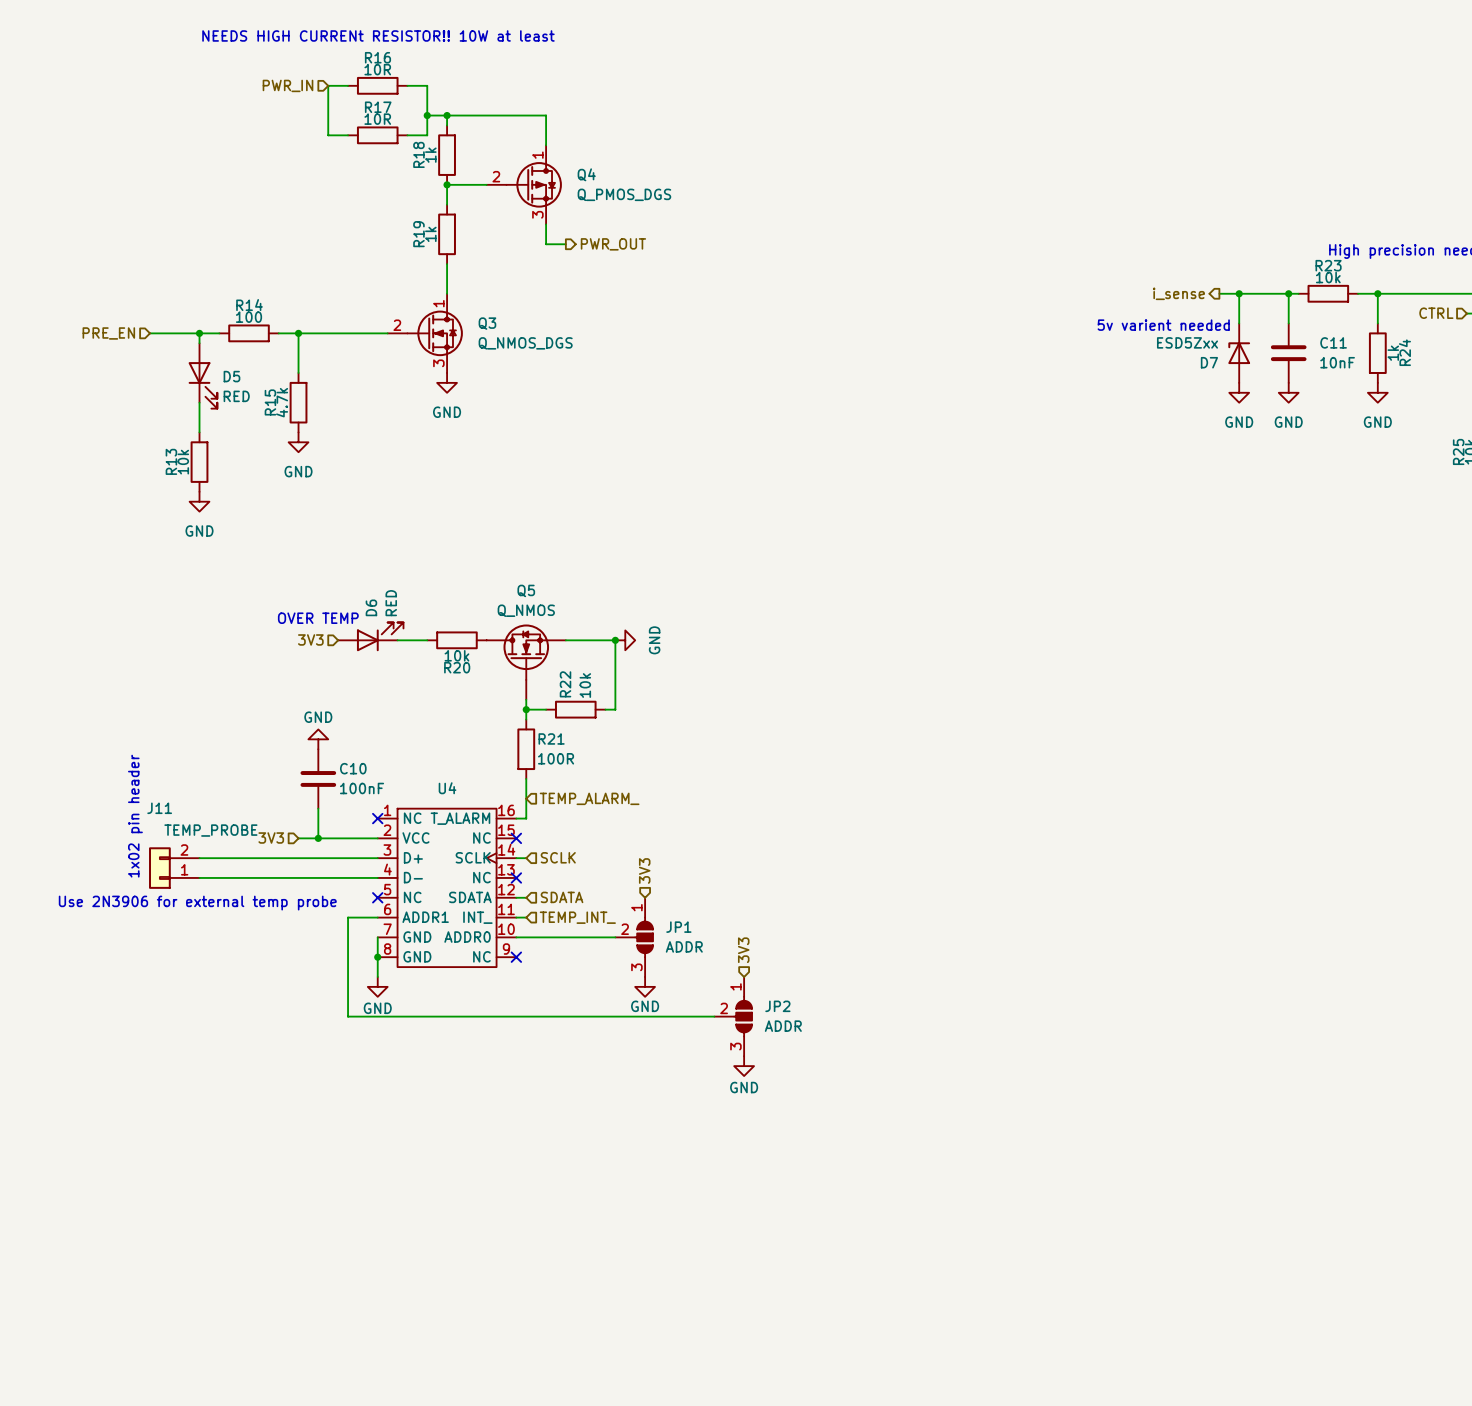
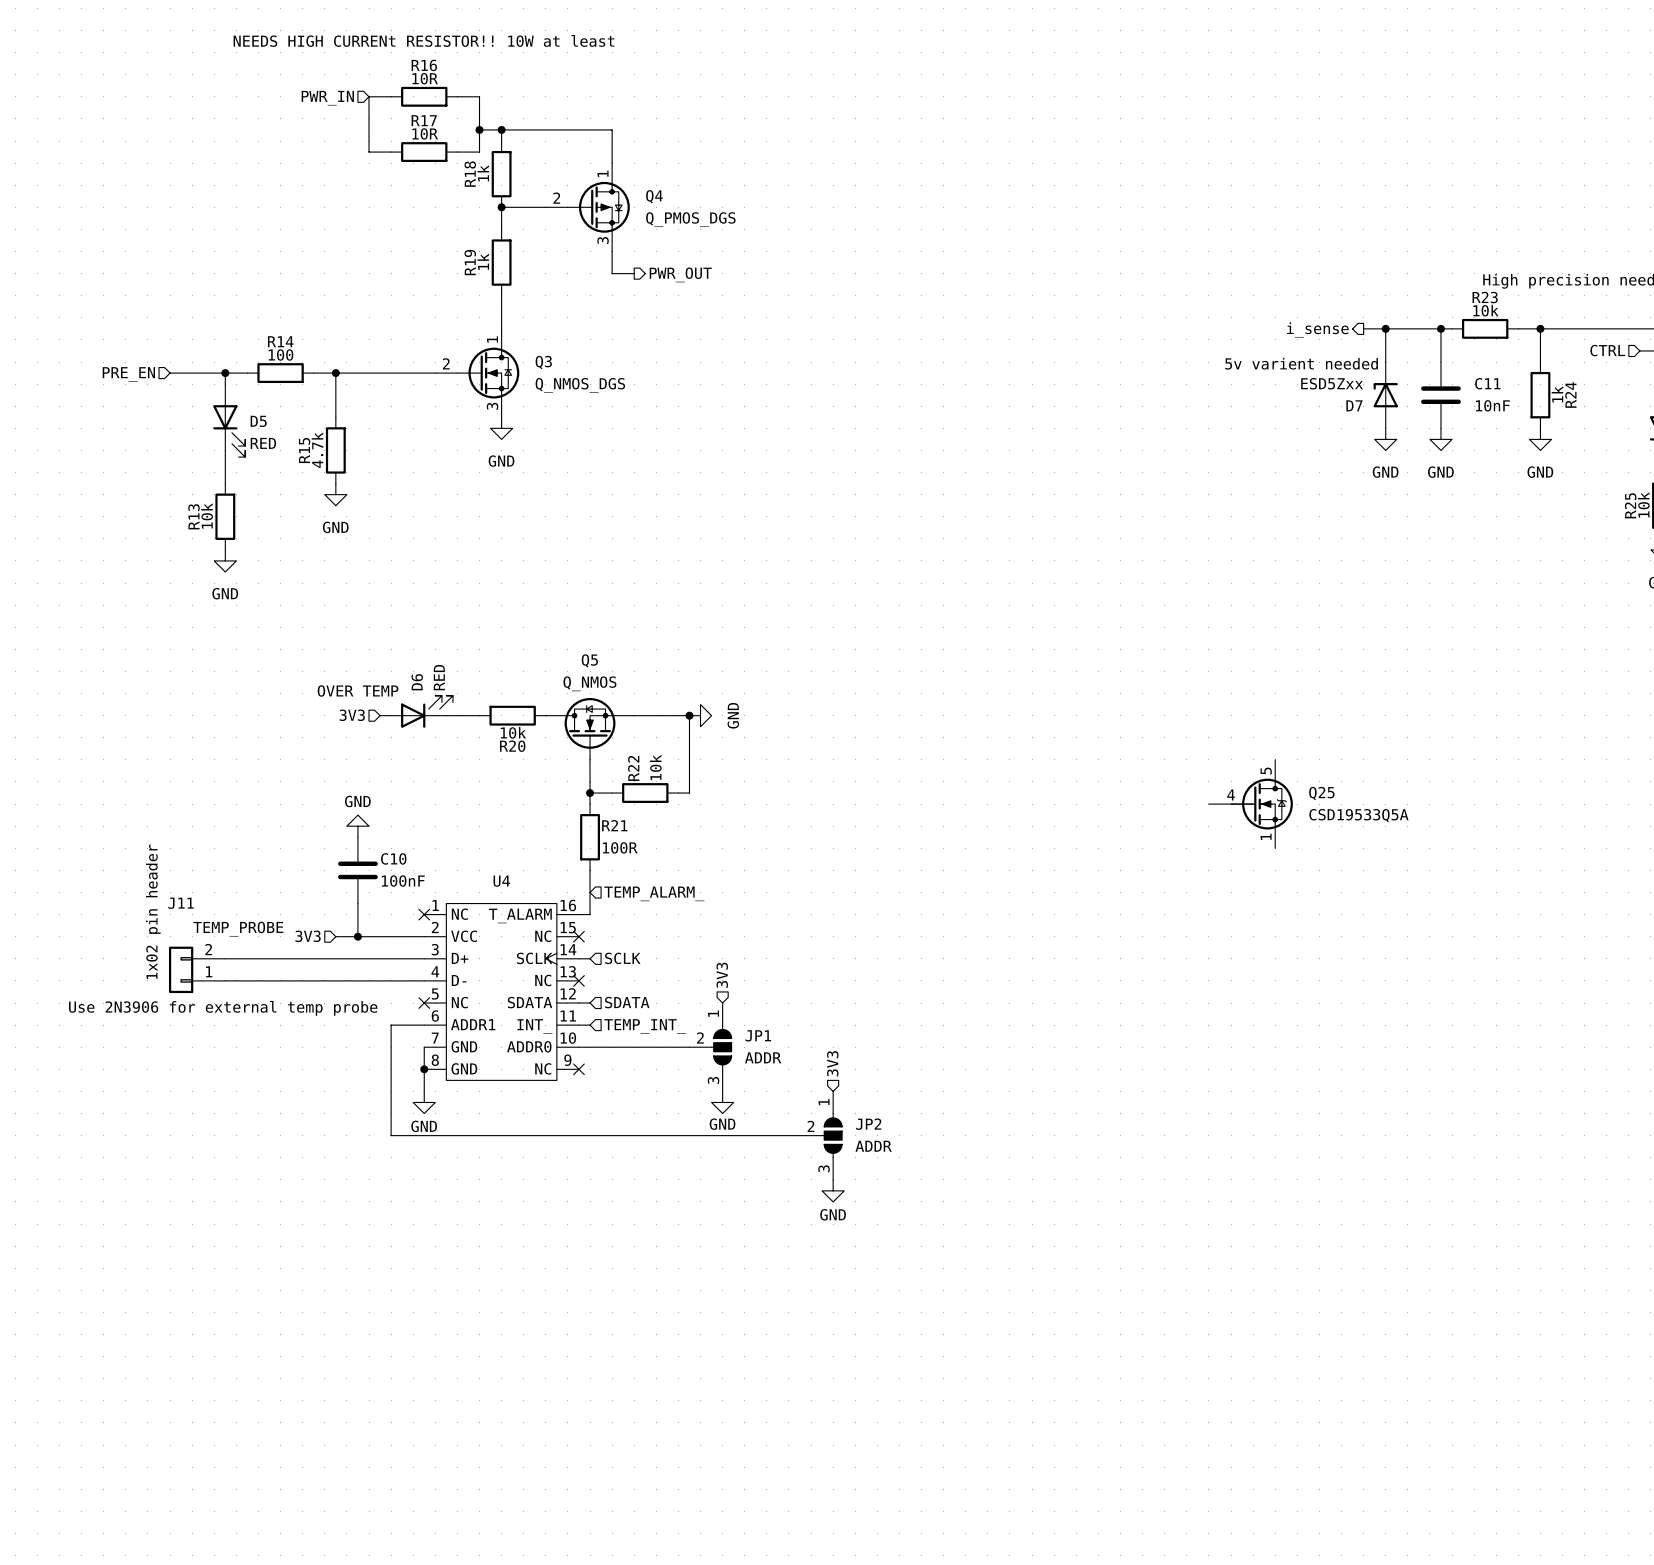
Q25: none -> CSD19533Q5A (1250, 804)

